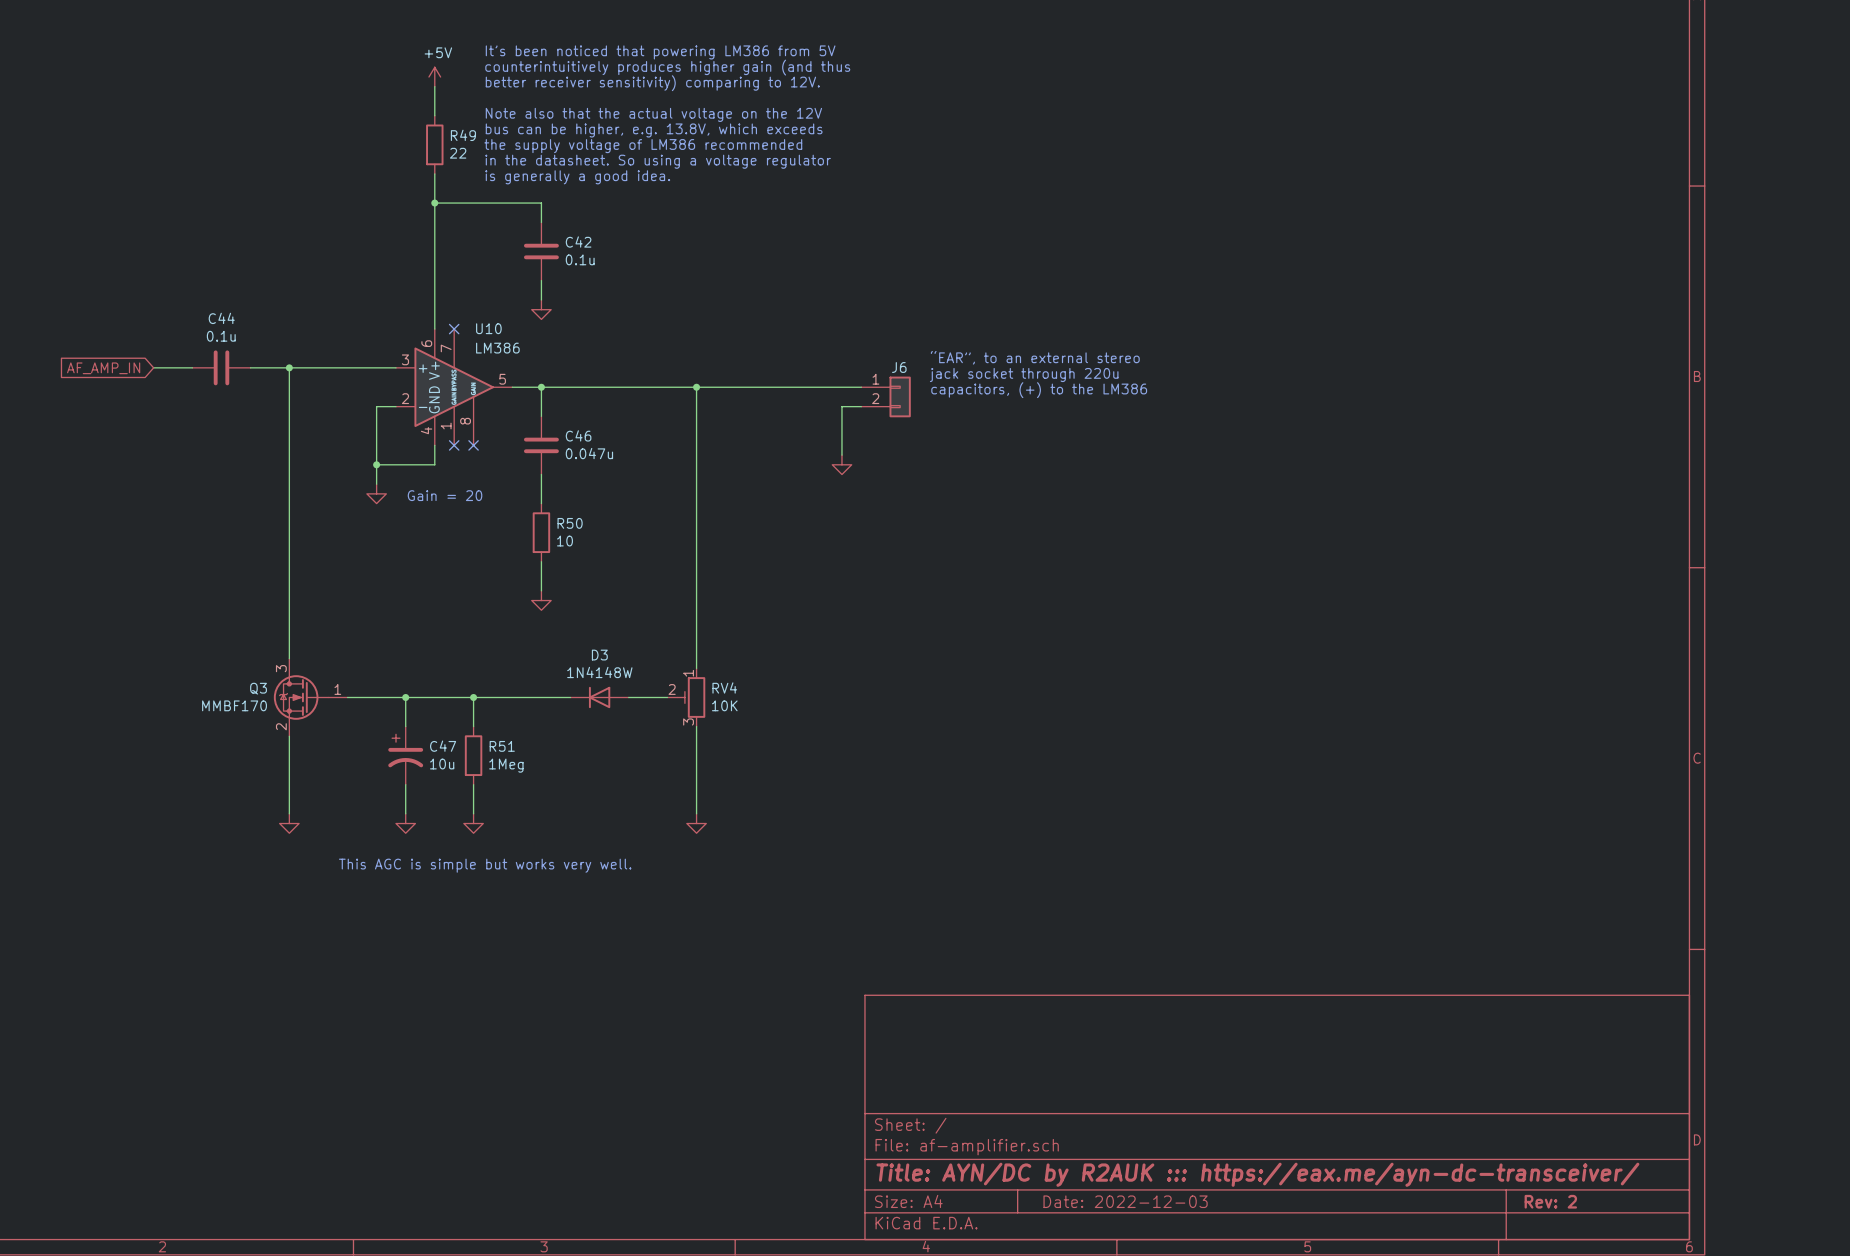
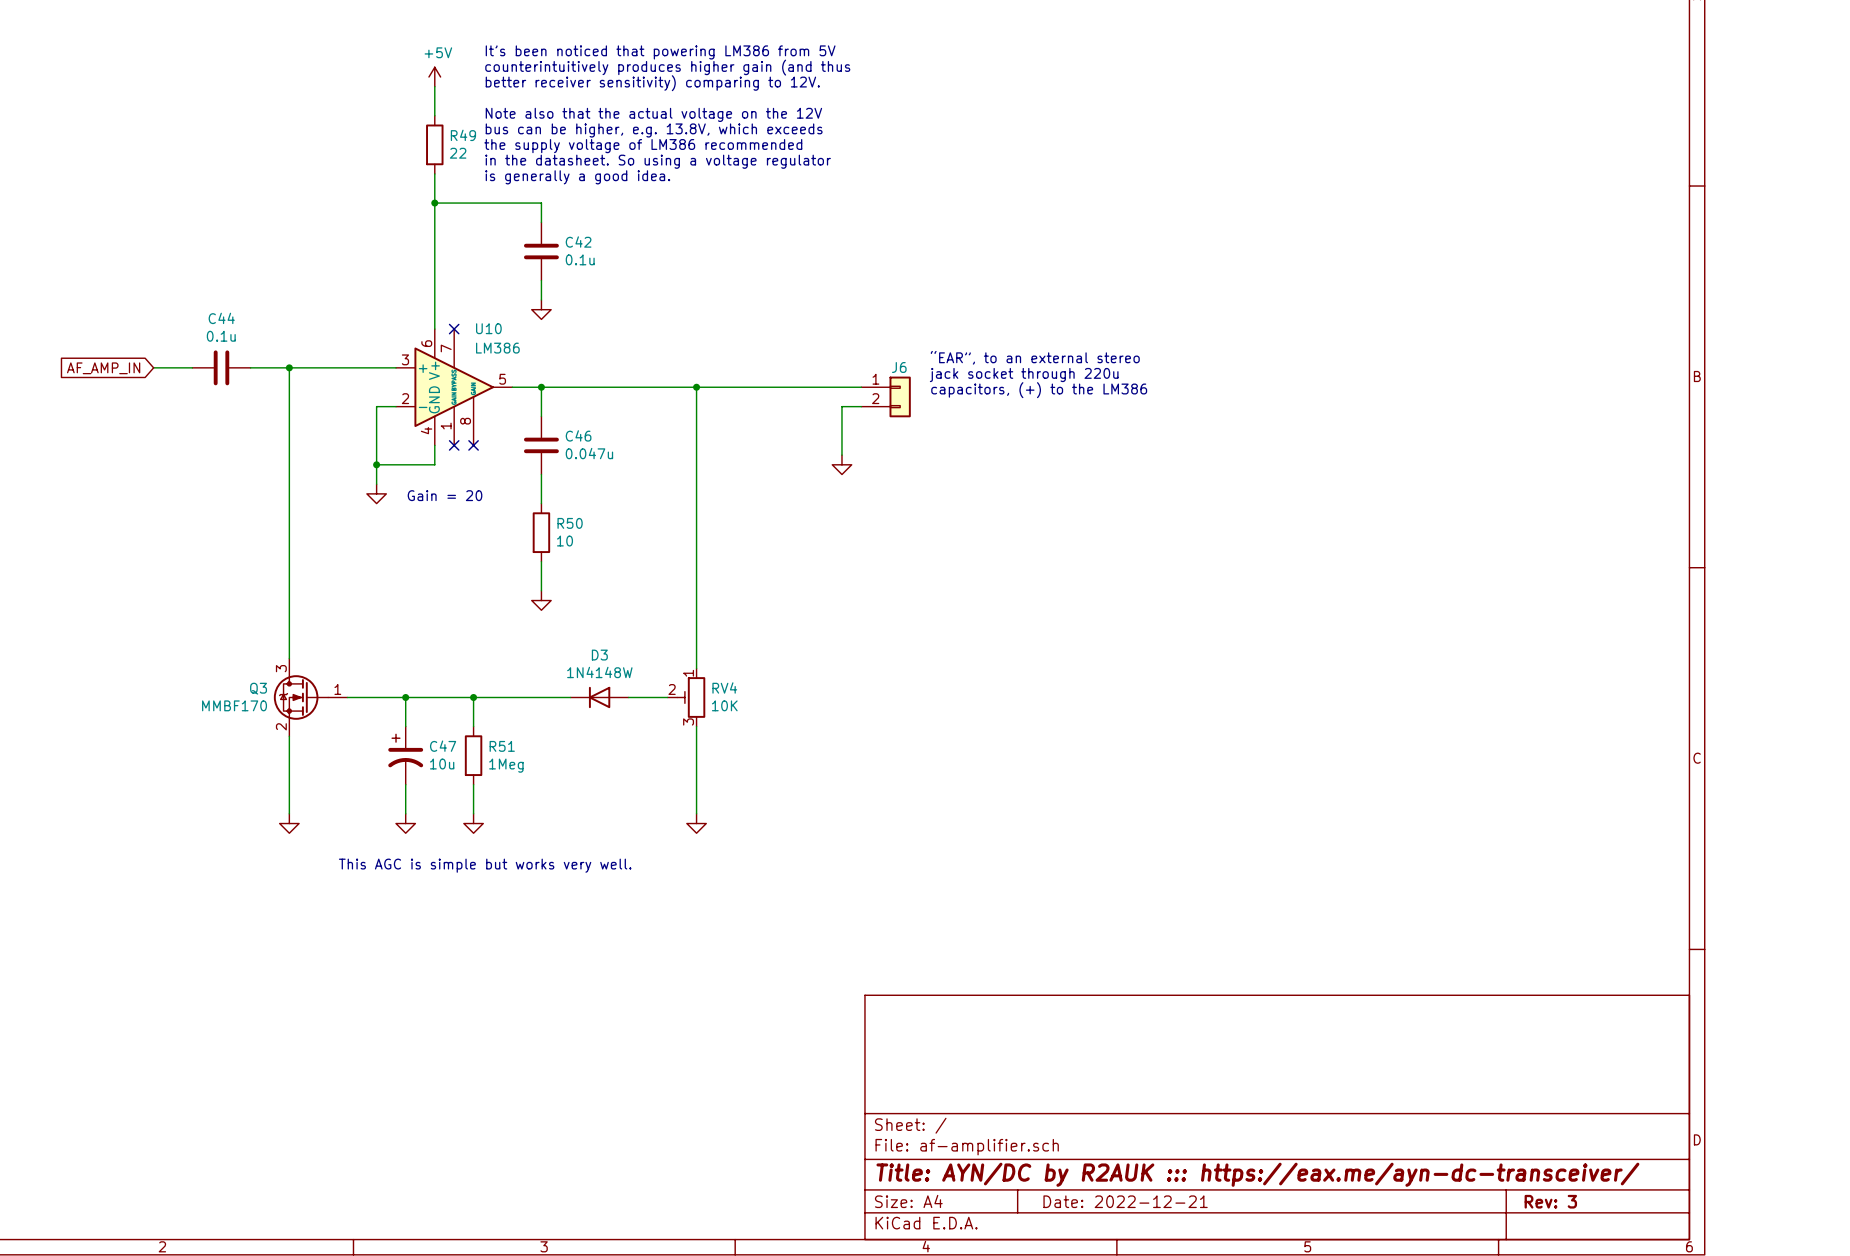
title block: Date: 2022-12-03 (1125, 1201) -> Date: 2022-12-21 (1125, 1201)
title block: Rev: 2 (1550, 1201) -> Rev: 3 (1550, 1201)

